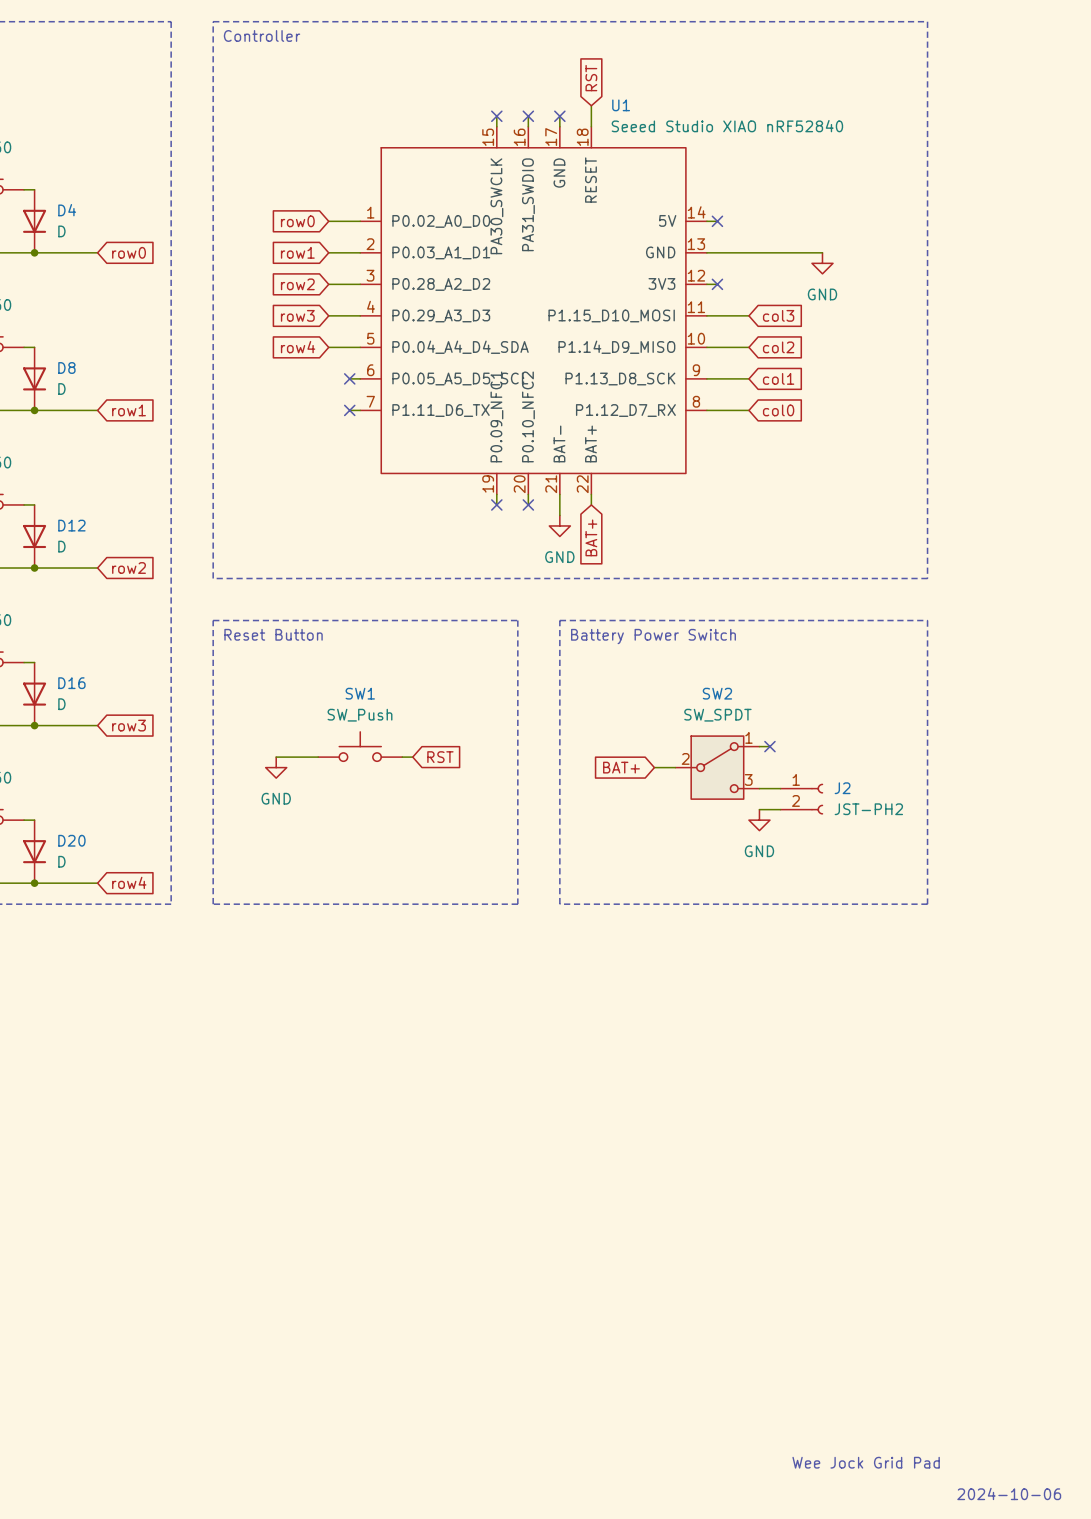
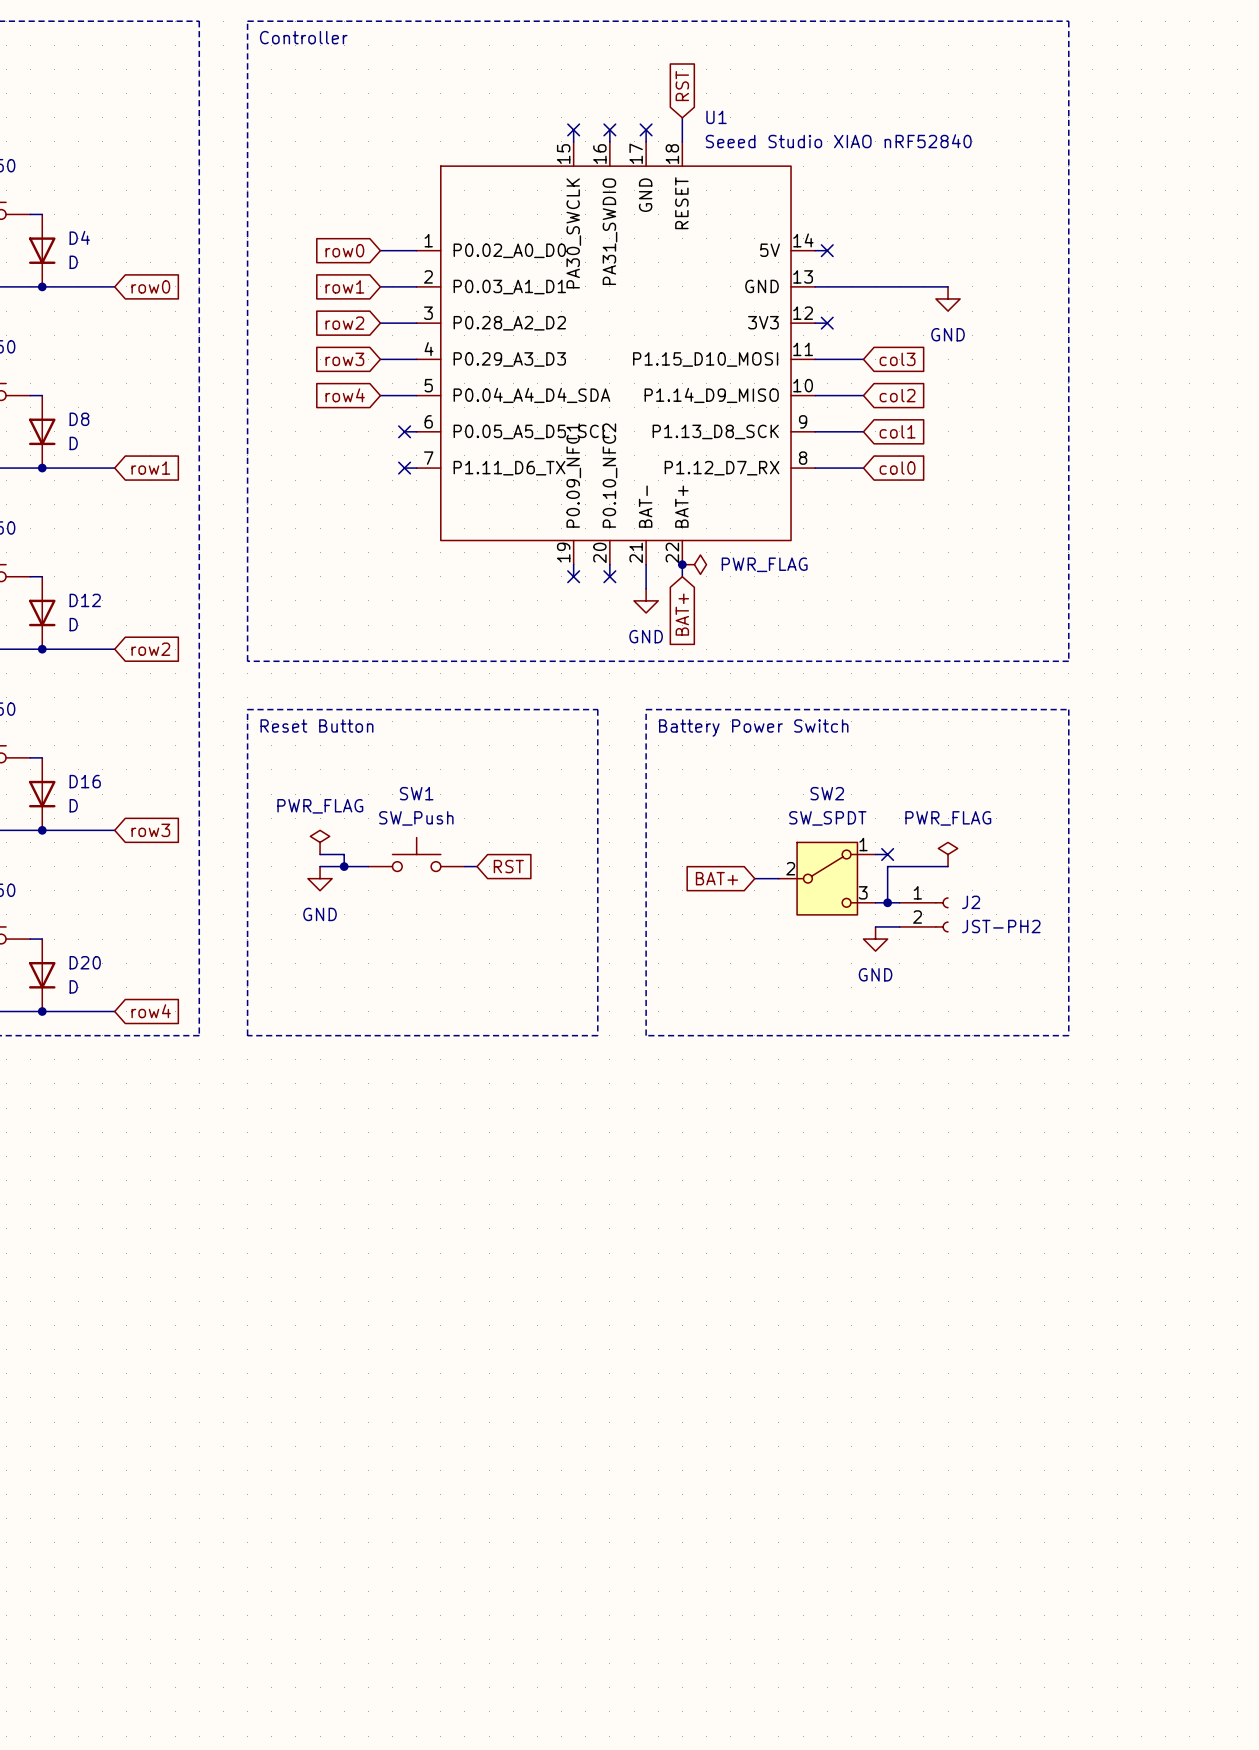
junction: none -> (682, 564)
power symbol: none -> PWR_FLAG (694, 564)
power symbol: none -> PWR_FLAG (320, 842)
wire: none -> (320, 854) (344, 854) (344, 866)
power symbol: none -> PWR_FLAG (948, 854)
junction: none -> (344, 866)
wire: none -> (948, 866) (887, 866) (887, 902)
junction: none -> (887, 902)
text: Wee Jock Grid Pad (866, 1462) -> none
text: 2024-10-06 (1009, 1493) -> none

